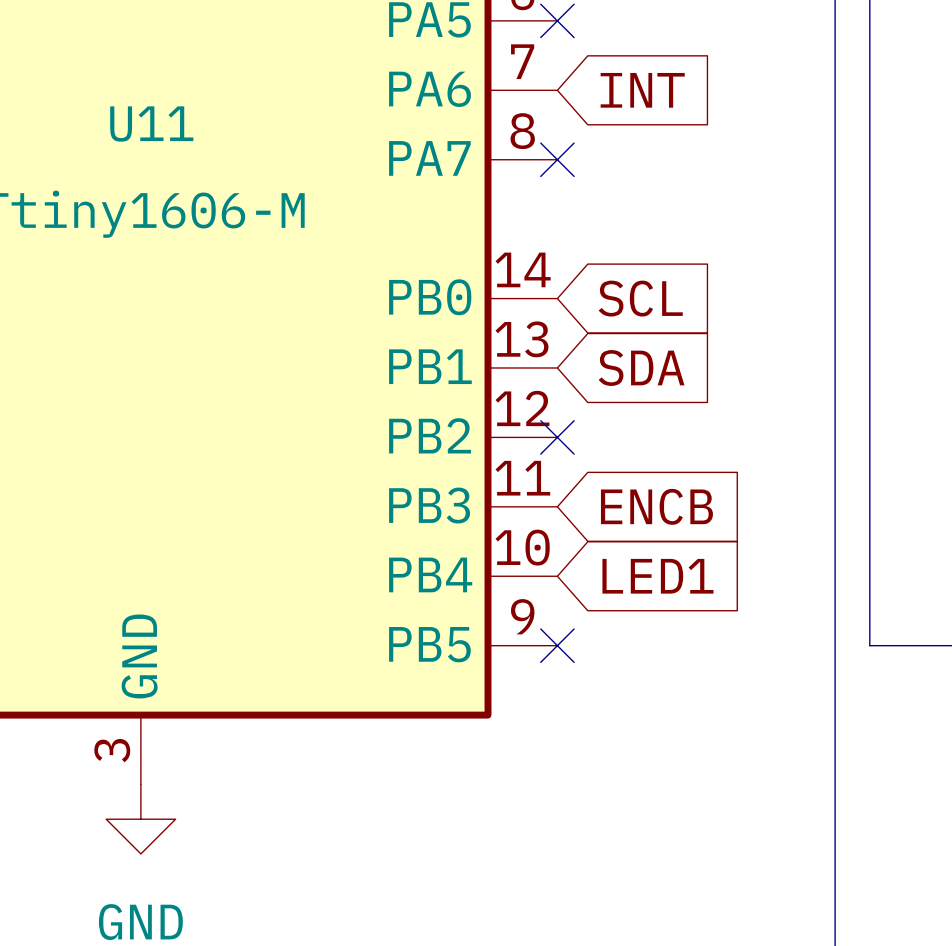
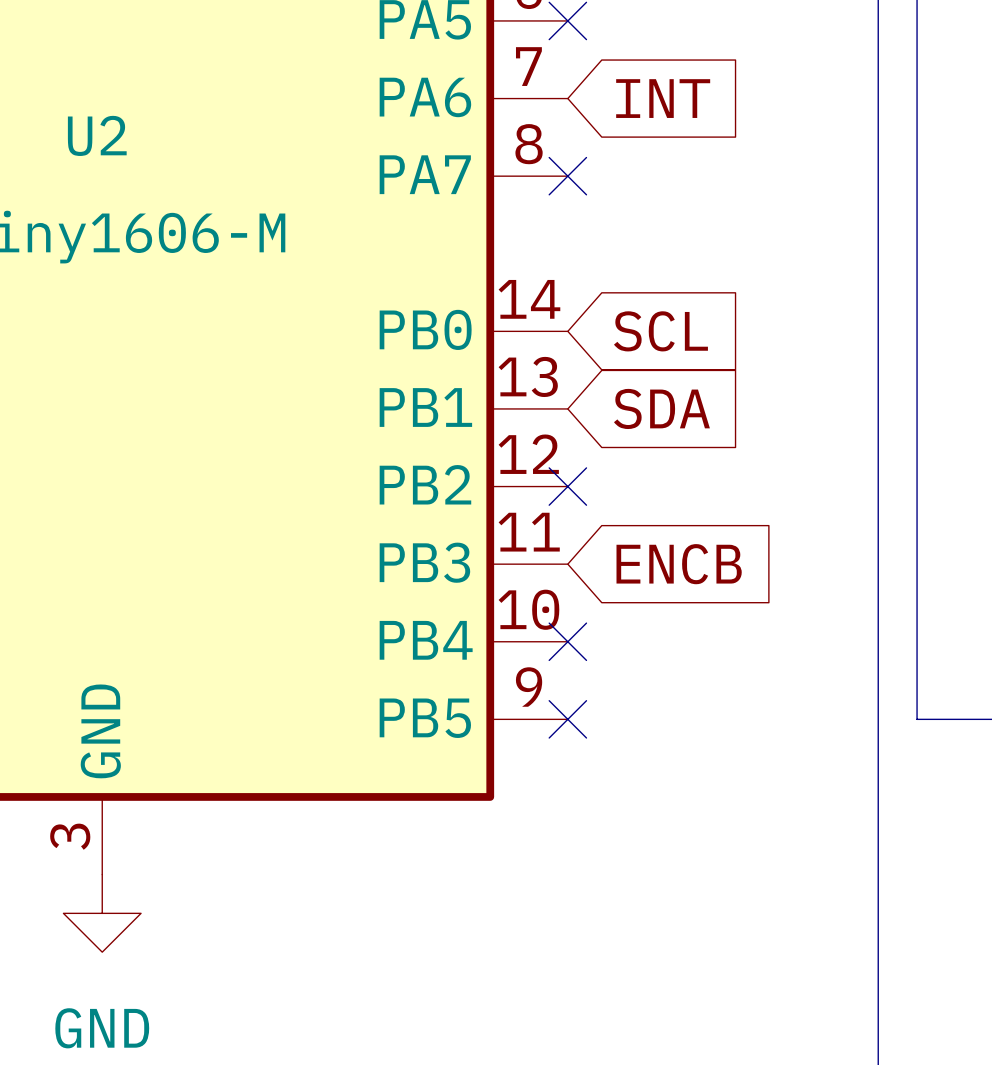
U11 name: U11 (151, 124) -> U2 (97, 135)
no-connect mark: none -> (567, 641)
global label: LED1 (657, 576) -> none

